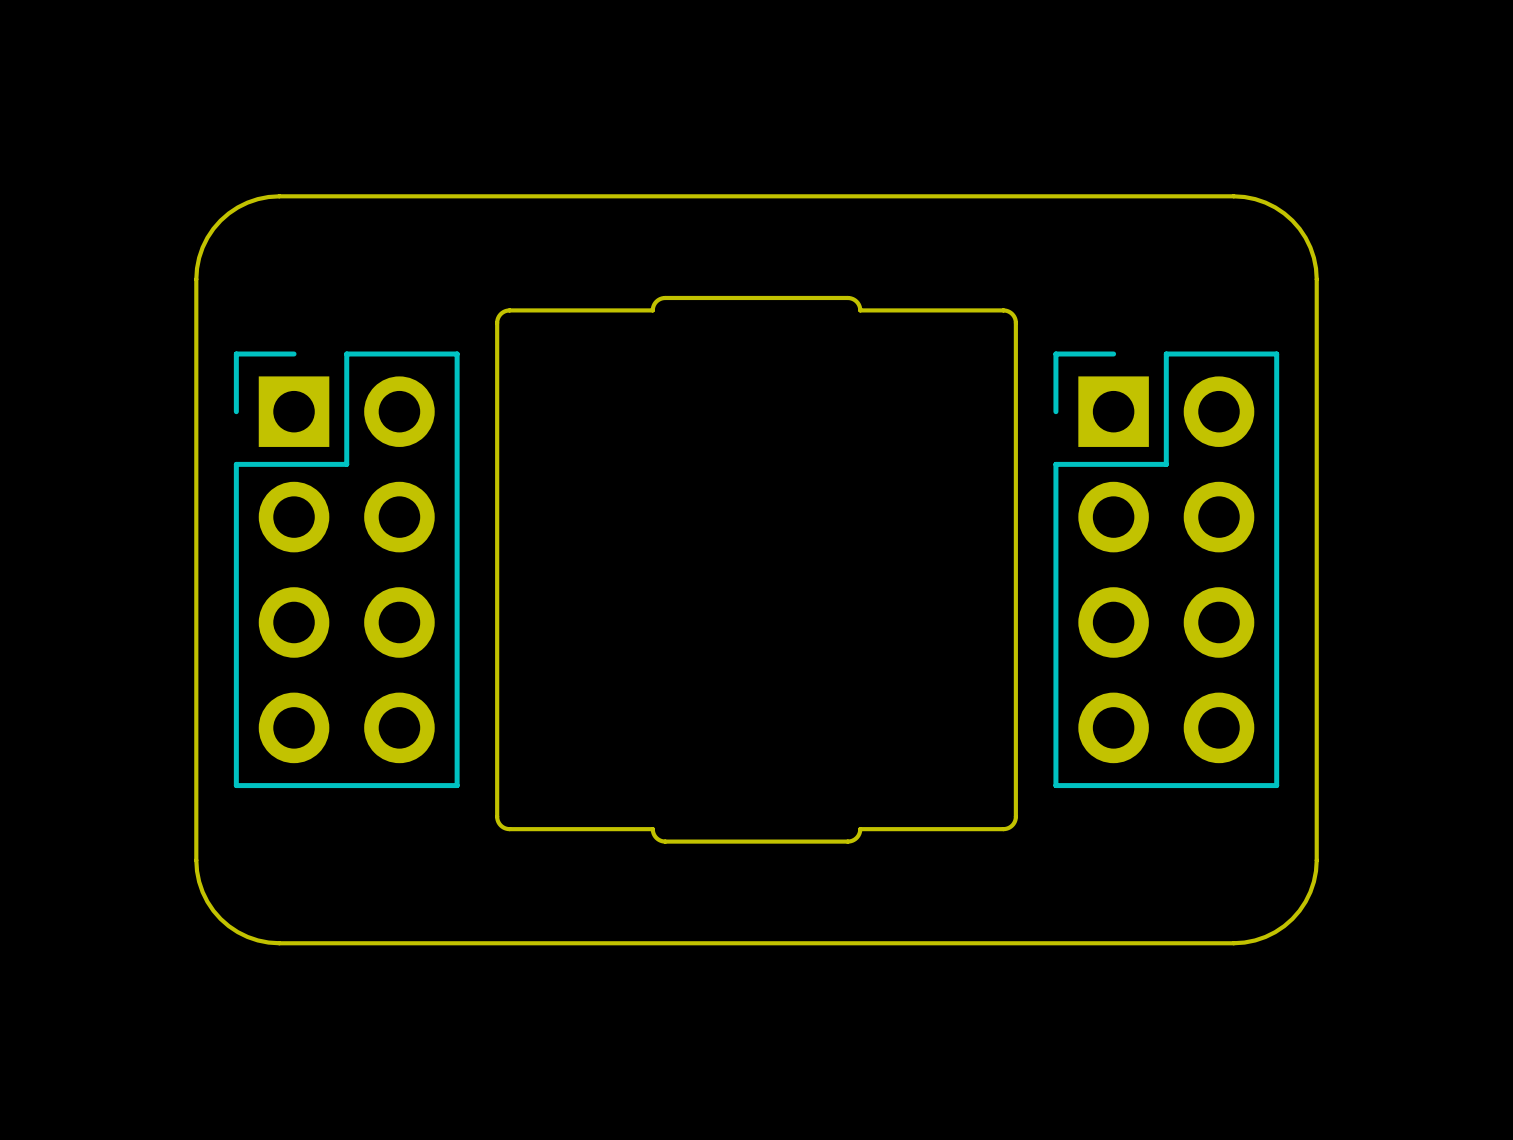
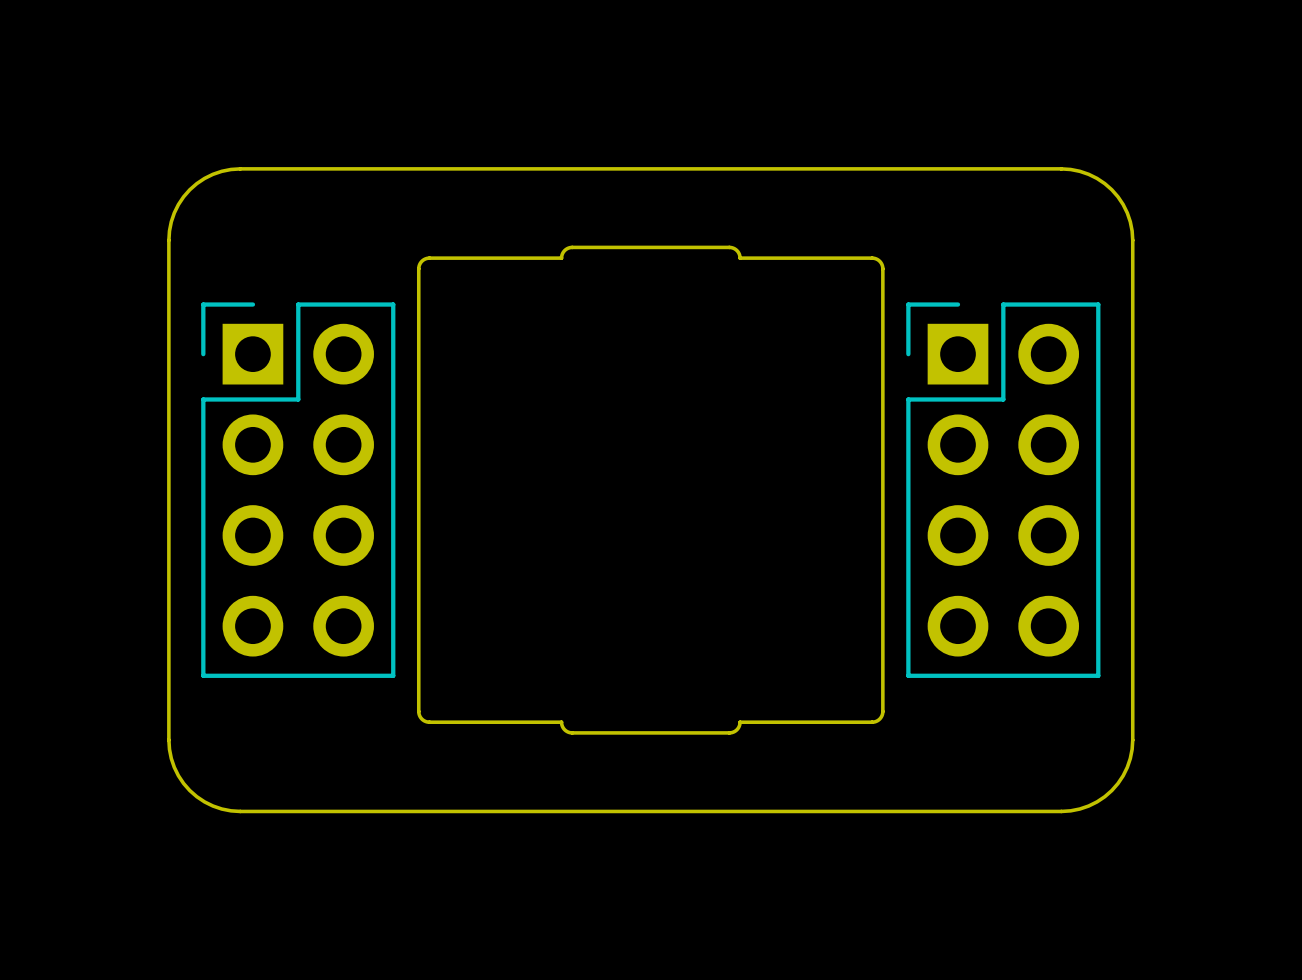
board edge: none -> (740, 258) (873, 258) (879, 261) (882, 268)
board edge: none -> (740, 258) (736, 250) (729, 247) (572, 247) (564, 250) (561, 258) (429, 258) (420, 262) (418, 268) (418, 711)
board edge: (860, 310) (1005, 310) (1012, 314) (1015, 322) -> none
board edge: (860, 310) (856, 301) (847, 297) (665, 297) (656, 301) (652, 310) (509, 310) (499, 315) (497, 322) (497, 816) -> none
board edge: none -> (882, 268) (882, 711) (880, 718) (872, 722) (740, 722) (736, 729) (729, 732) (572, 732) (564, 729) (561, 722)
board edge: (1015, 322) (1015, 816) (1013, 824) (1003, 829) (860, 829) (856, 837) (847, 841) (665, 841) (656, 837) (652, 829) -> none
board edge: (497, 816) (500, 825) (507, 829) (652, 829) -> none
board edge: none -> (418, 711) (421, 719) (428, 722) (561, 722)

